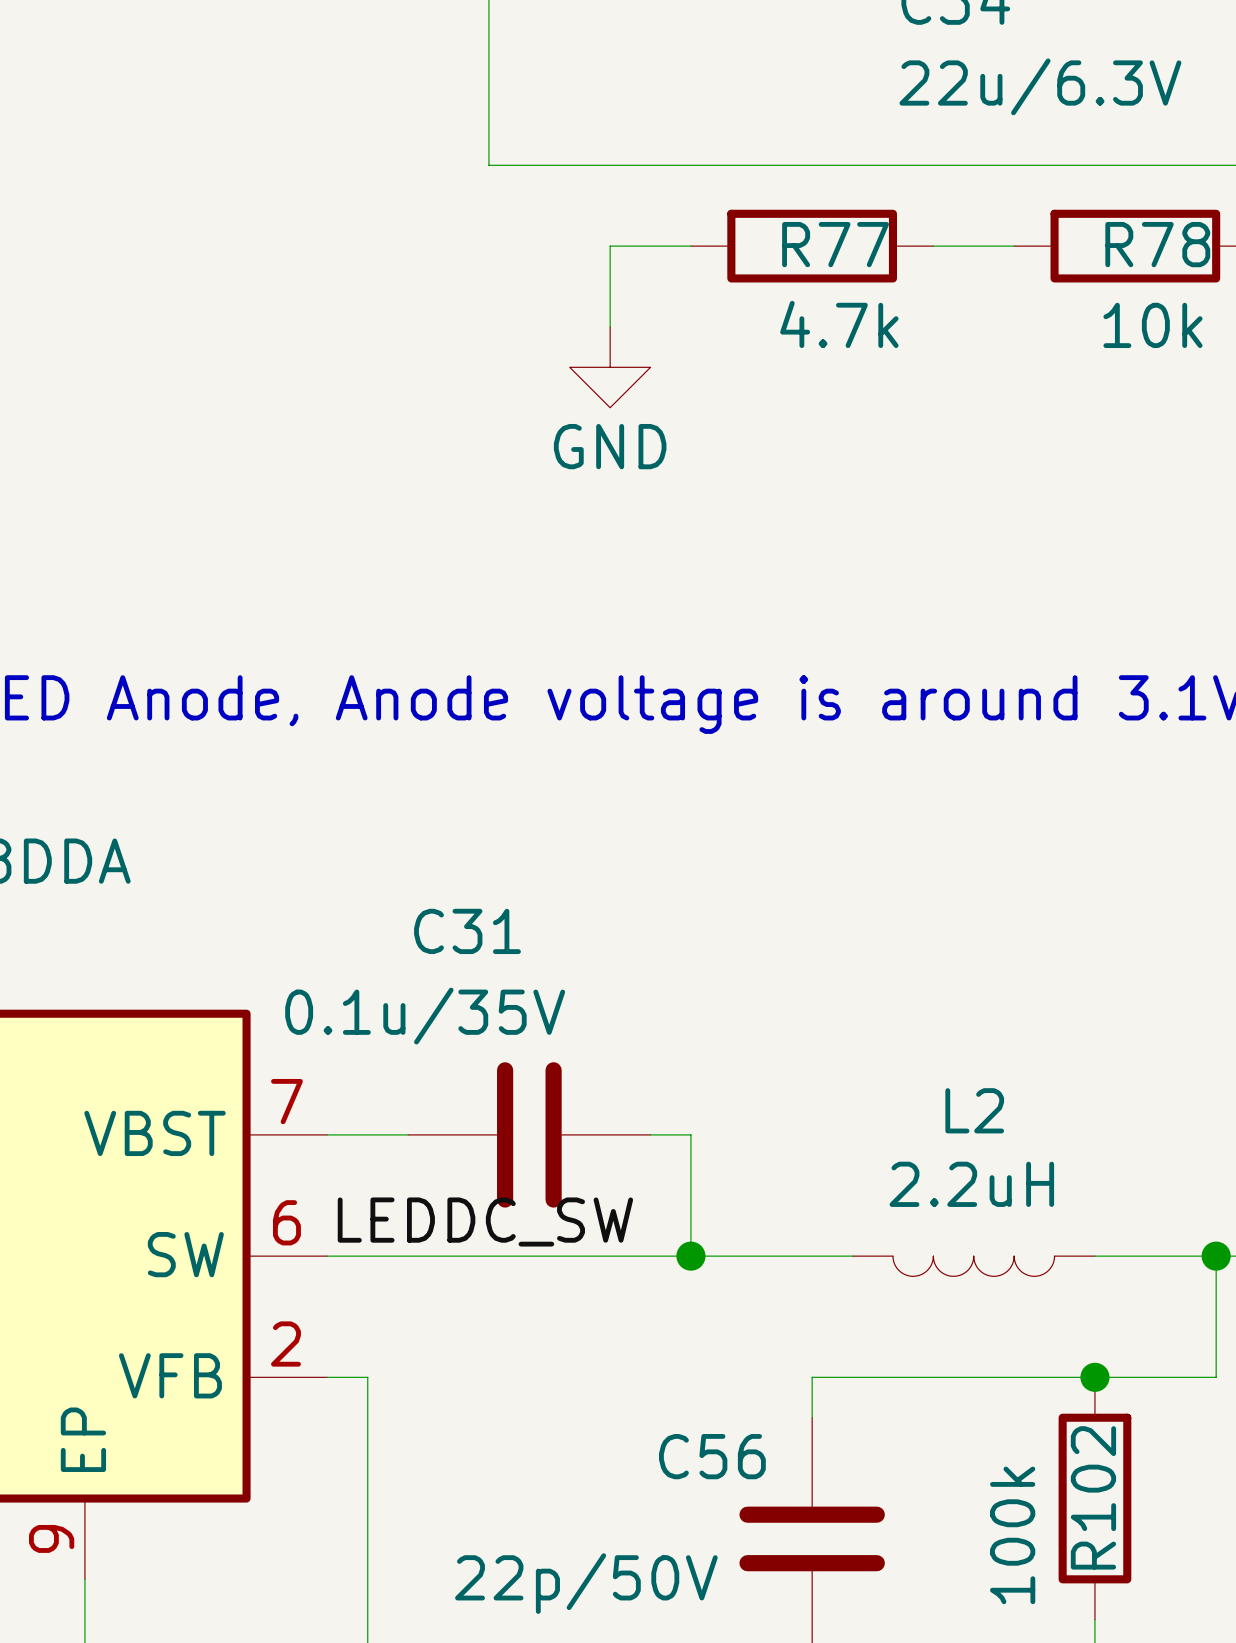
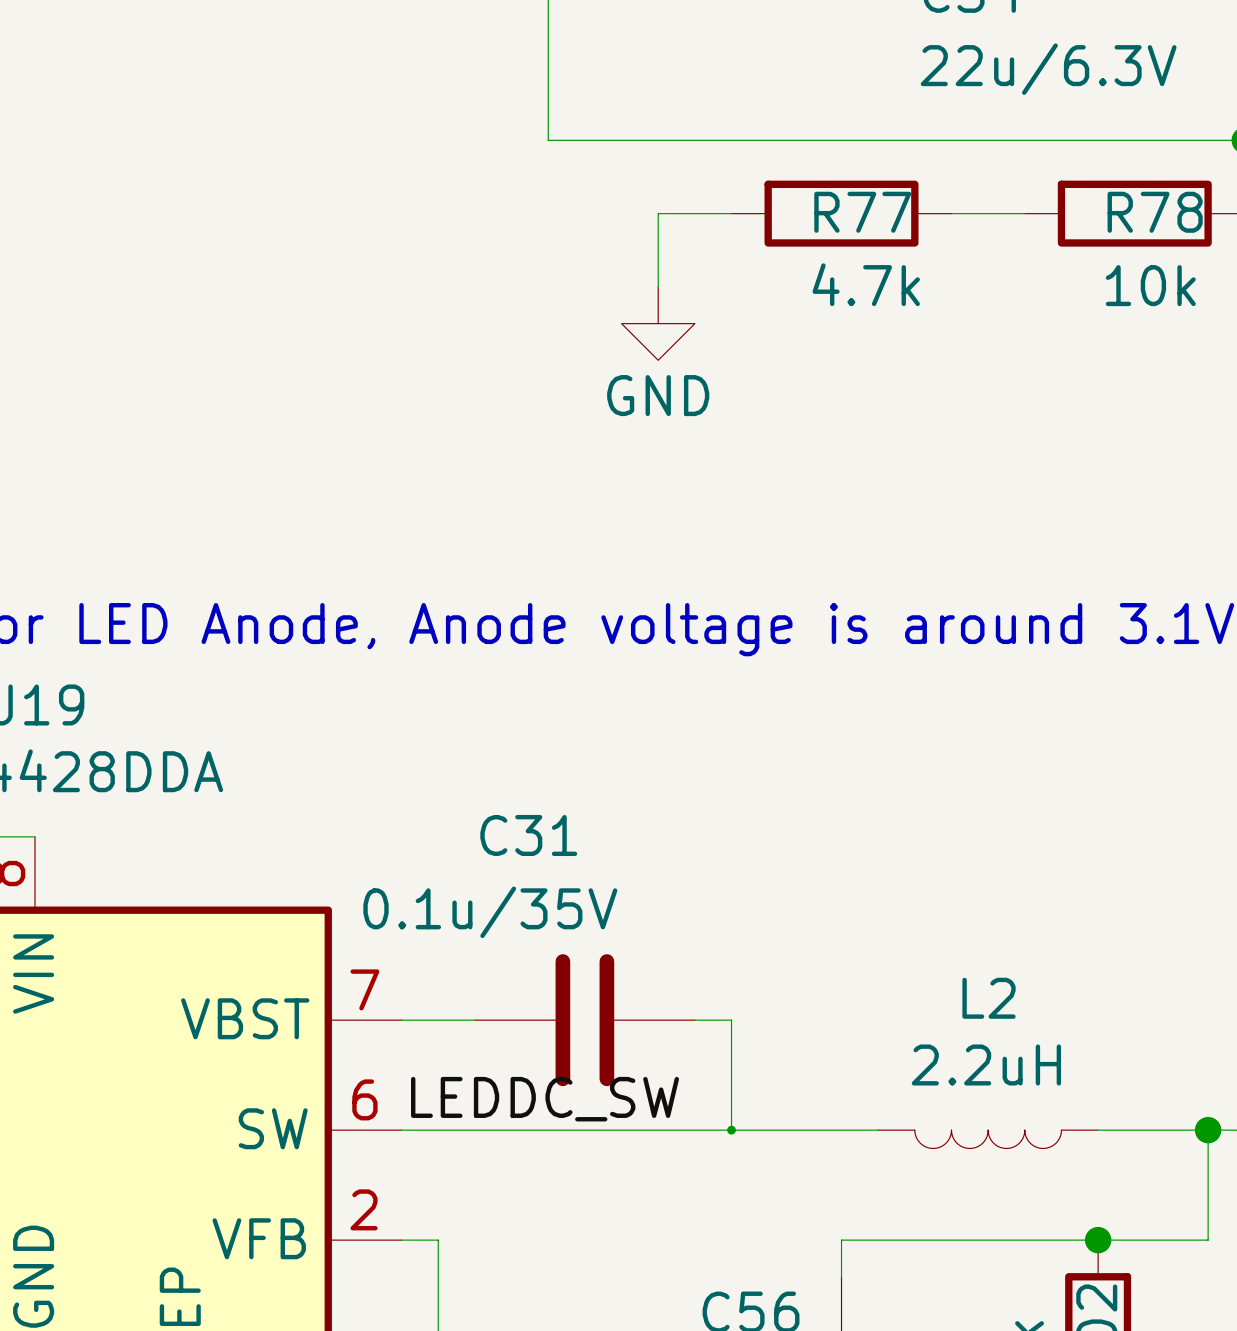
junction size: [676, 1241, 706, 1271] -> [727, 1125, 736, 1135]

